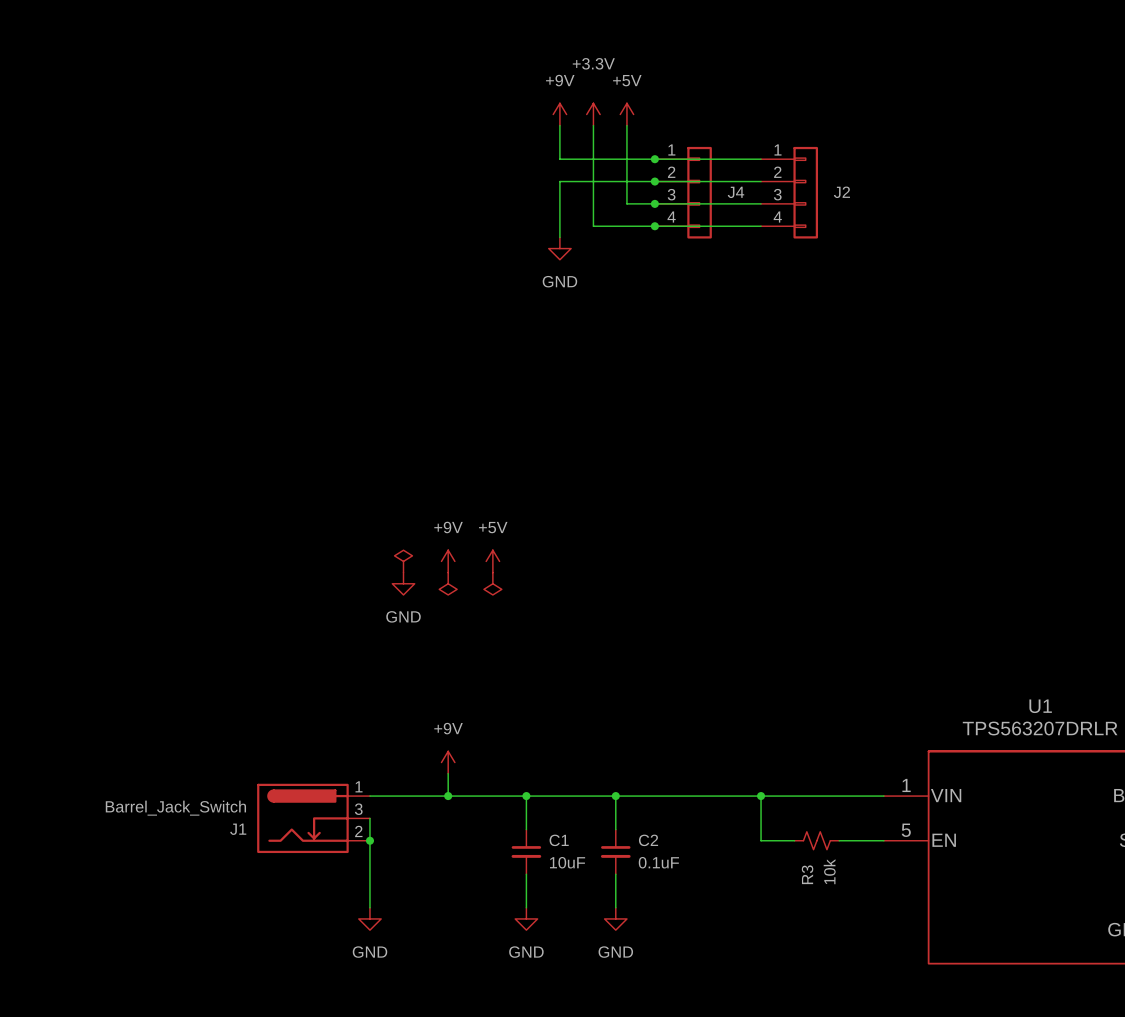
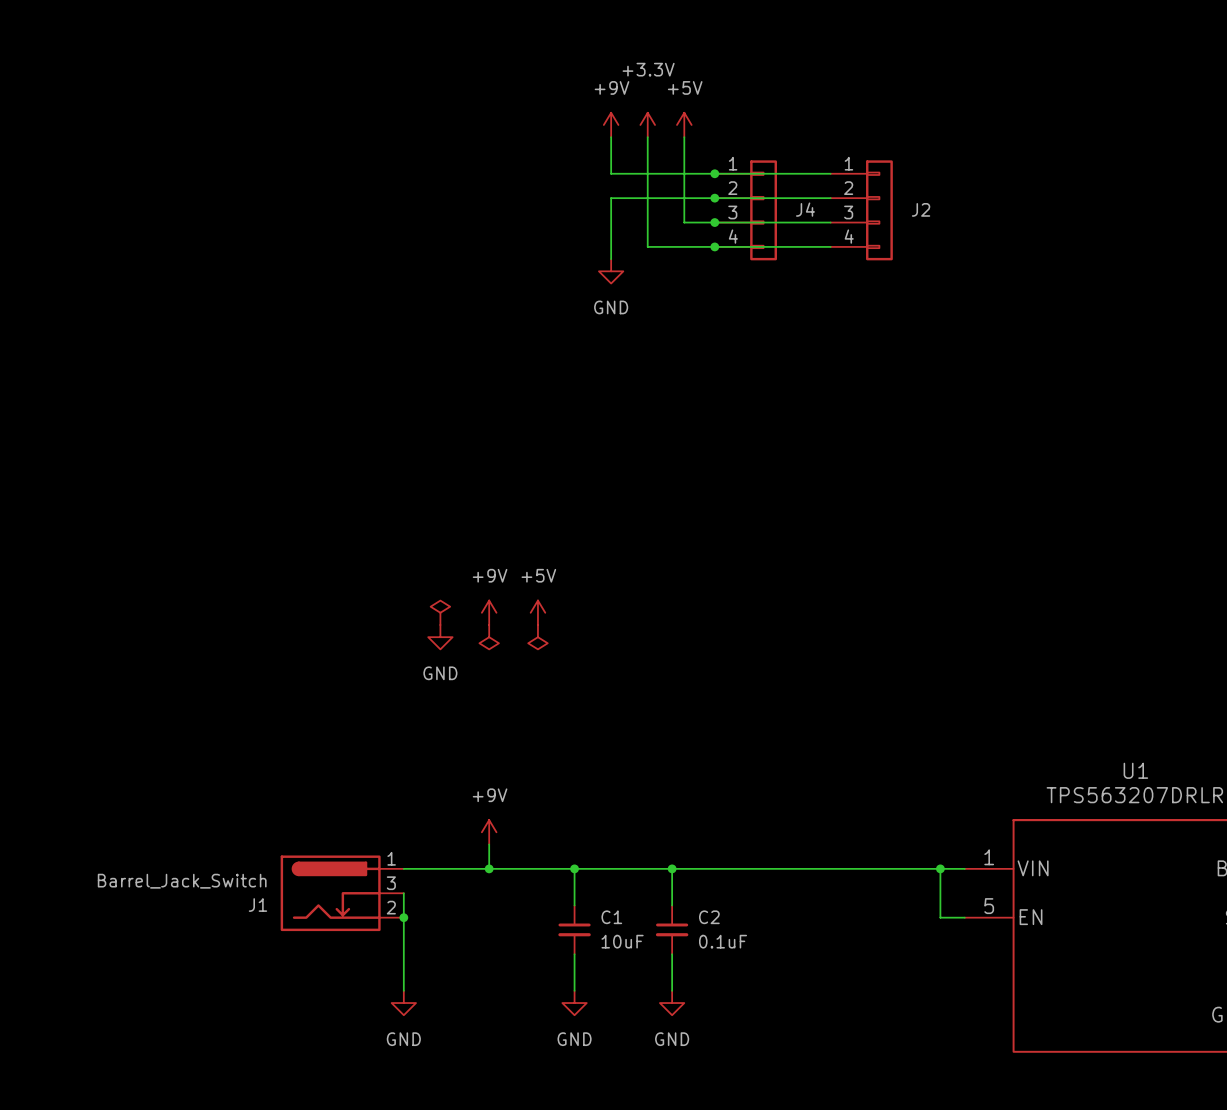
wire: (761, 796) (761, 840) (794, 840) -> none
junction: (761, 796) -> none
junction: none -> (940, 868)
R3: (816, 840) -> none
wire: (839, 840) (861, 840) -> (940, 868) (940, 917)

